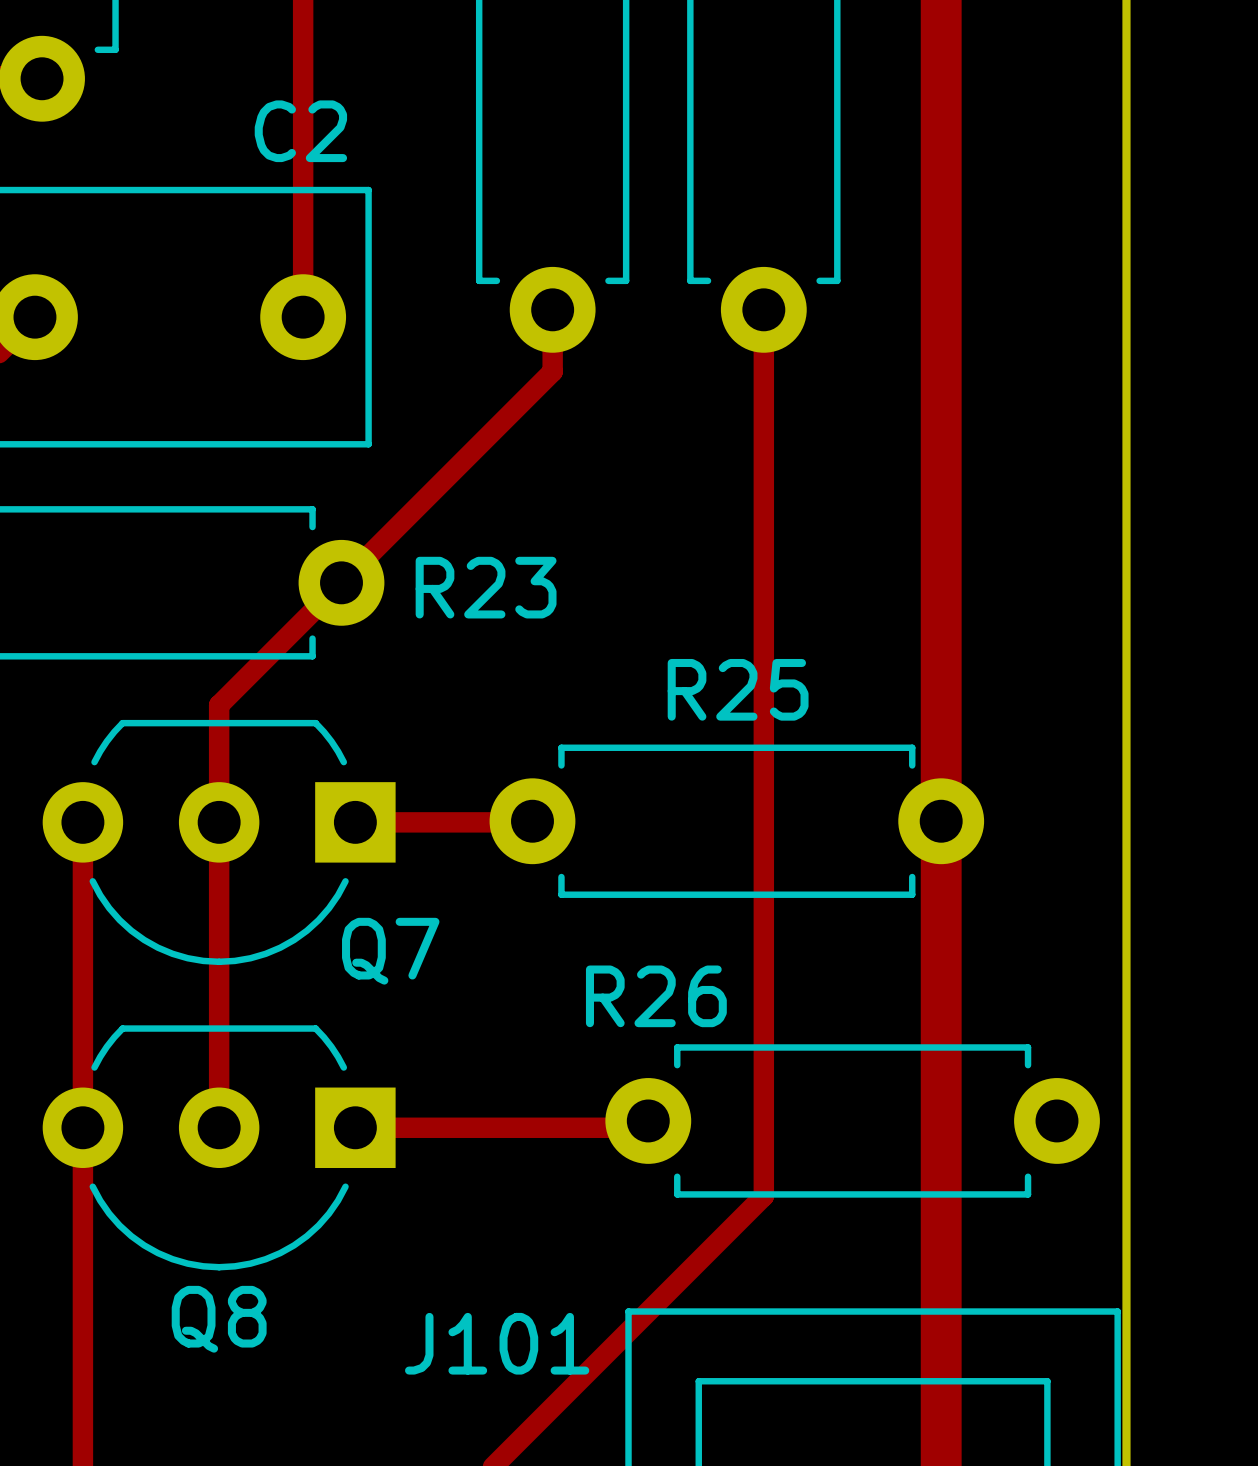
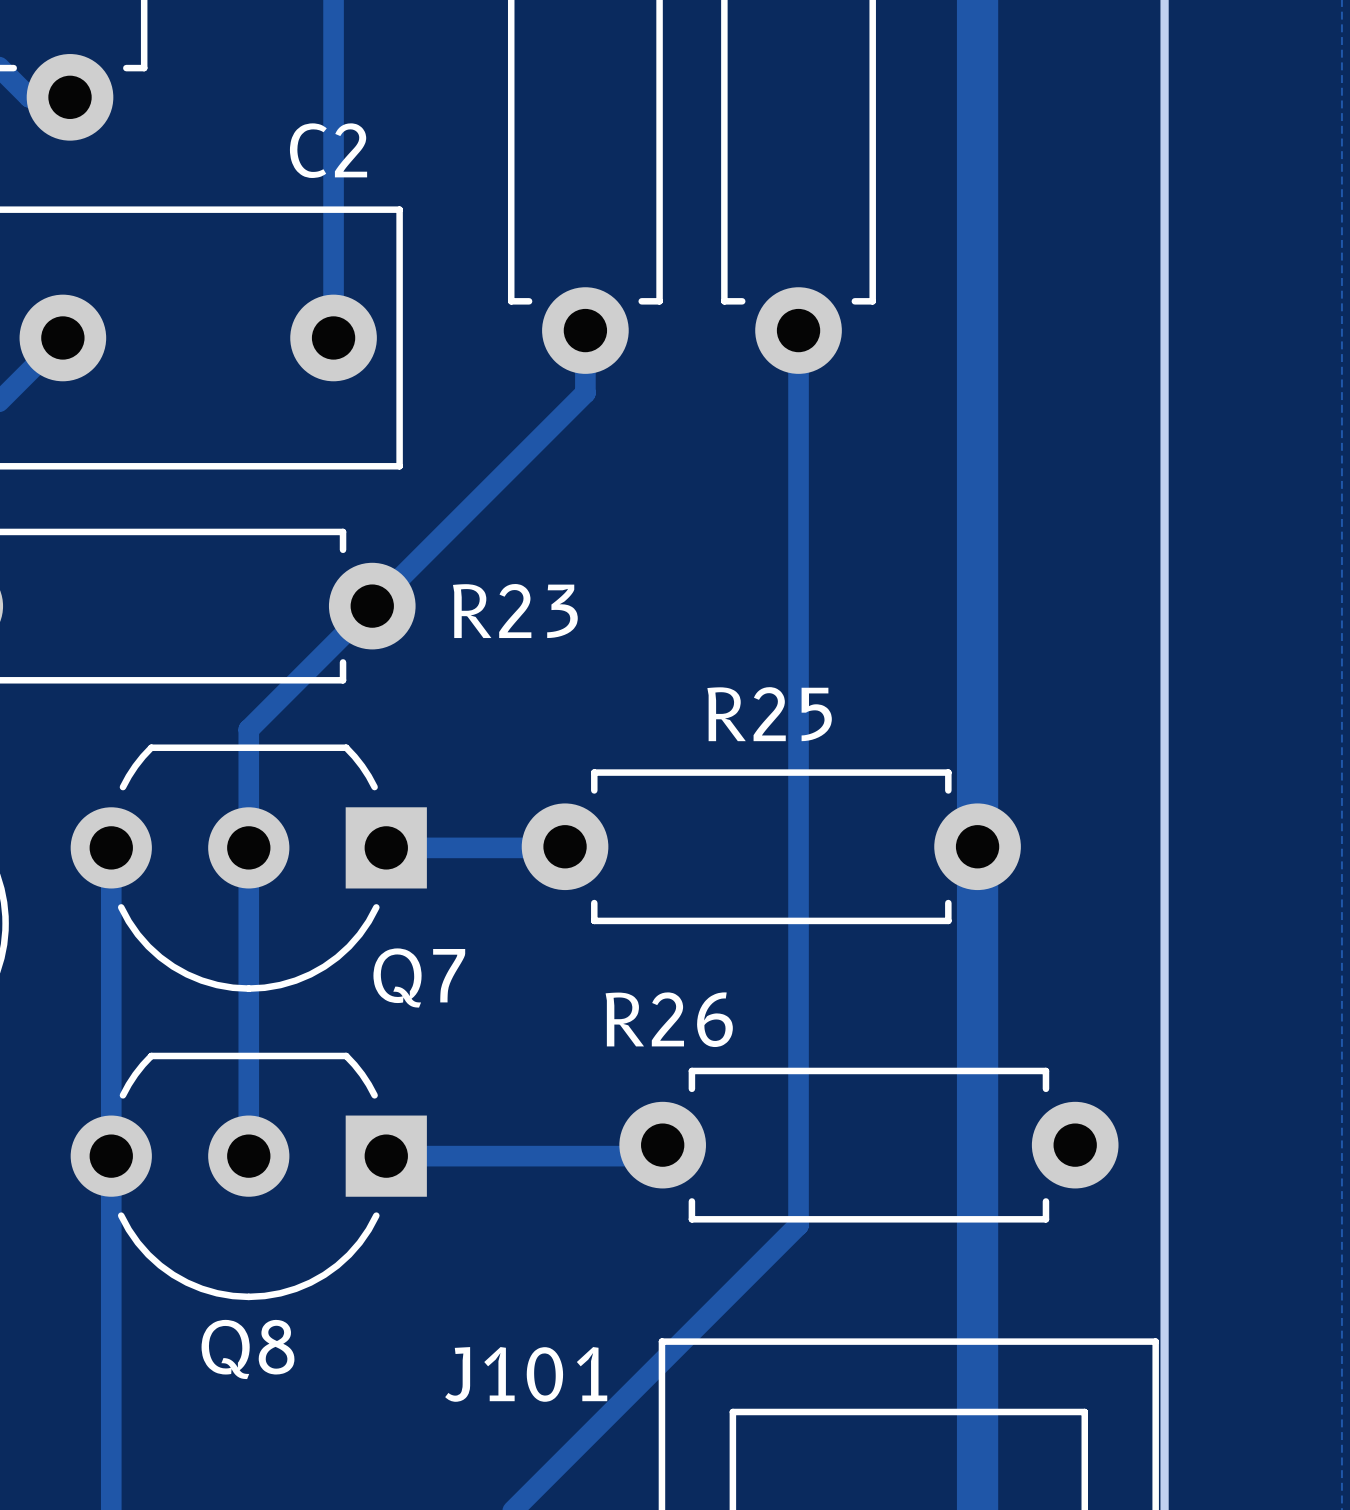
R26 position: (852, 1120) -> (868, 1145)

